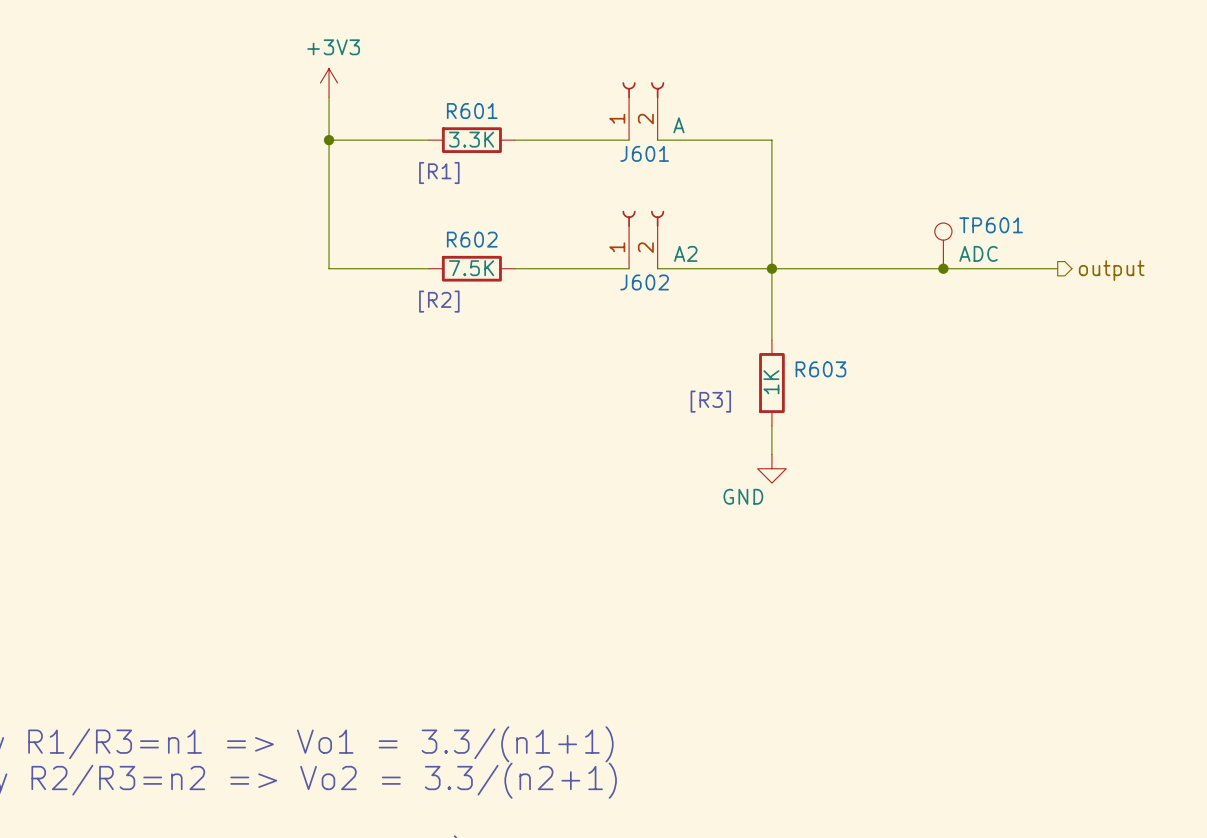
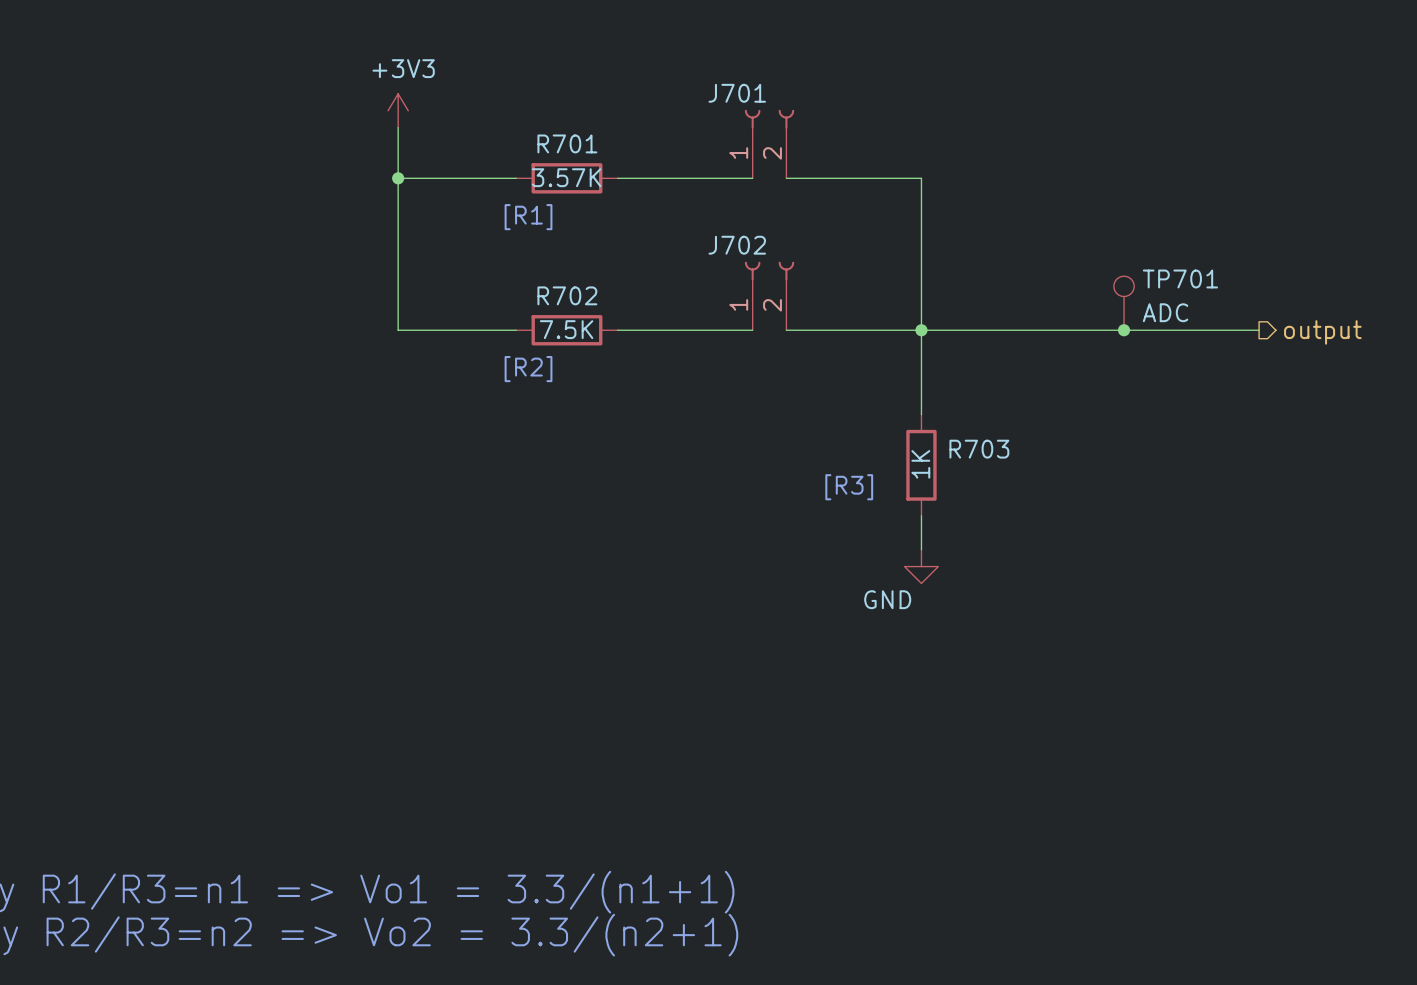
R601 name: R601 (472, 111) -> R701 (567, 143)
J601 value: A (678, 125) -> none
R601 value: 3.3K (471, 139) -> 3.57K (566, 177)
J601 name: J601 (644, 153) -> J701 (737, 93)
TP601 name: TP601 (991, 225) -> TP701 (1180, 278)
R602 name: R602 (472, 239) -> R702 (567, 295)
J602 value: A2 (685, 253) -> none
J602 name: J602 (644, 282) -> J702 (737, 245)
R603 name: R603 (820, 369) -> R703 (979, 449)

